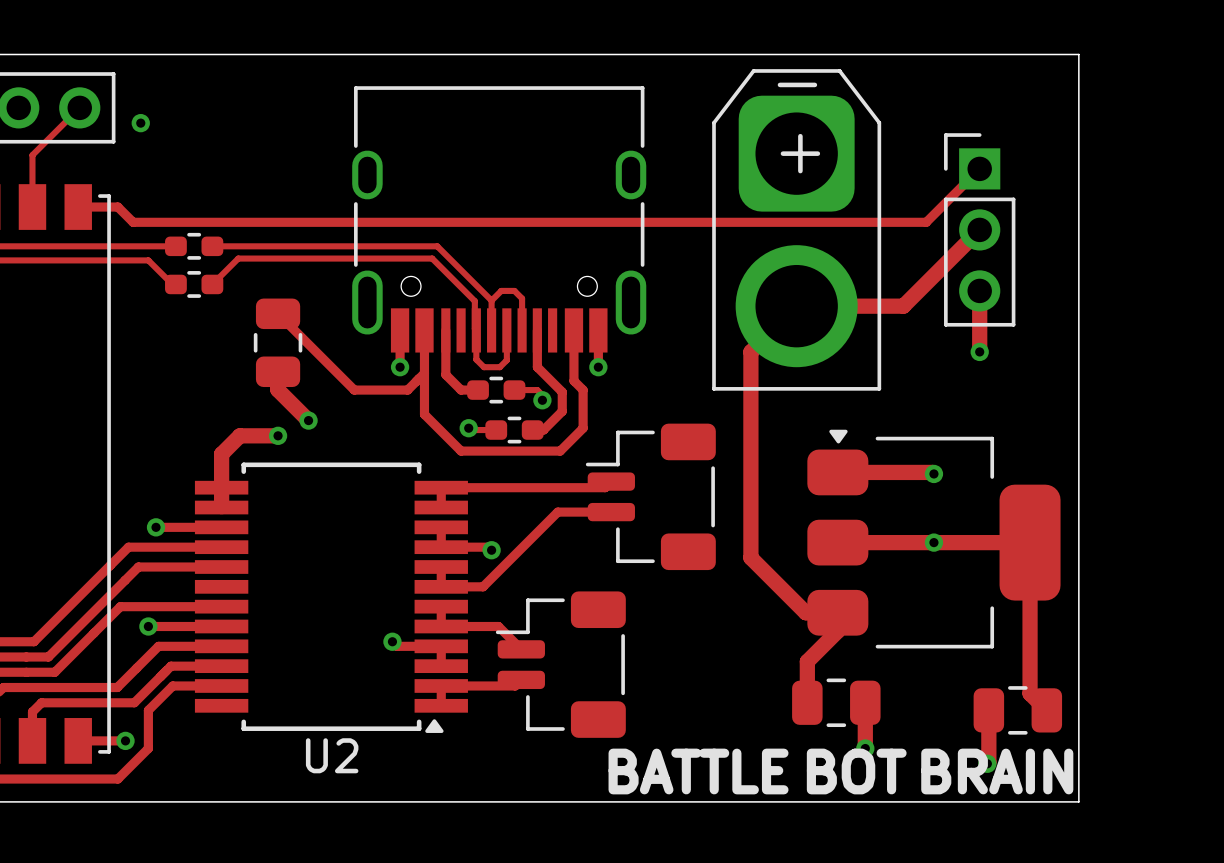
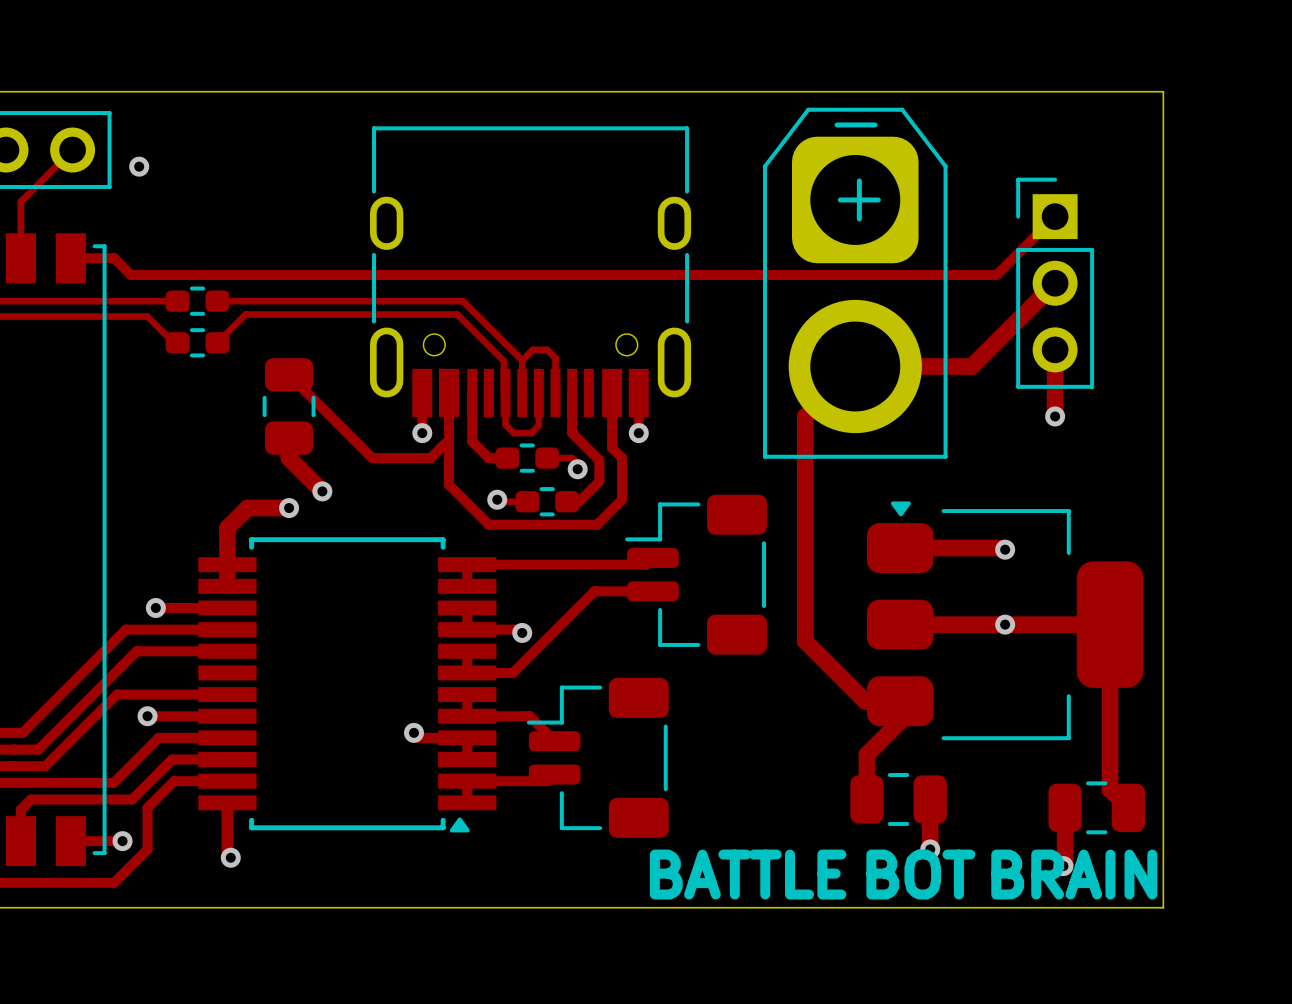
track: none -> (227, 802) (227, 854) (230, 857)
U2 name: U2 (332, 755) -> none
via: none -> (230, 857)

